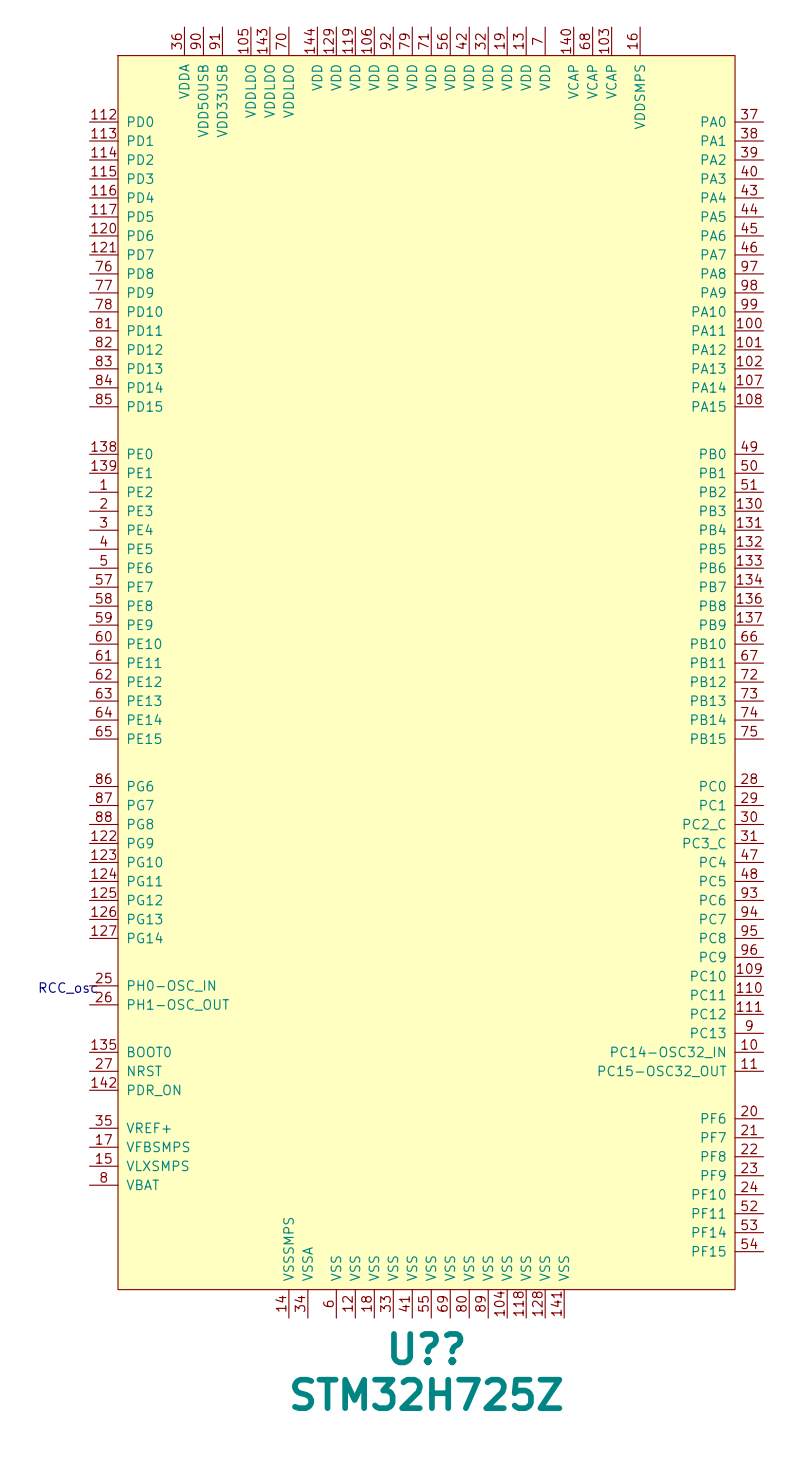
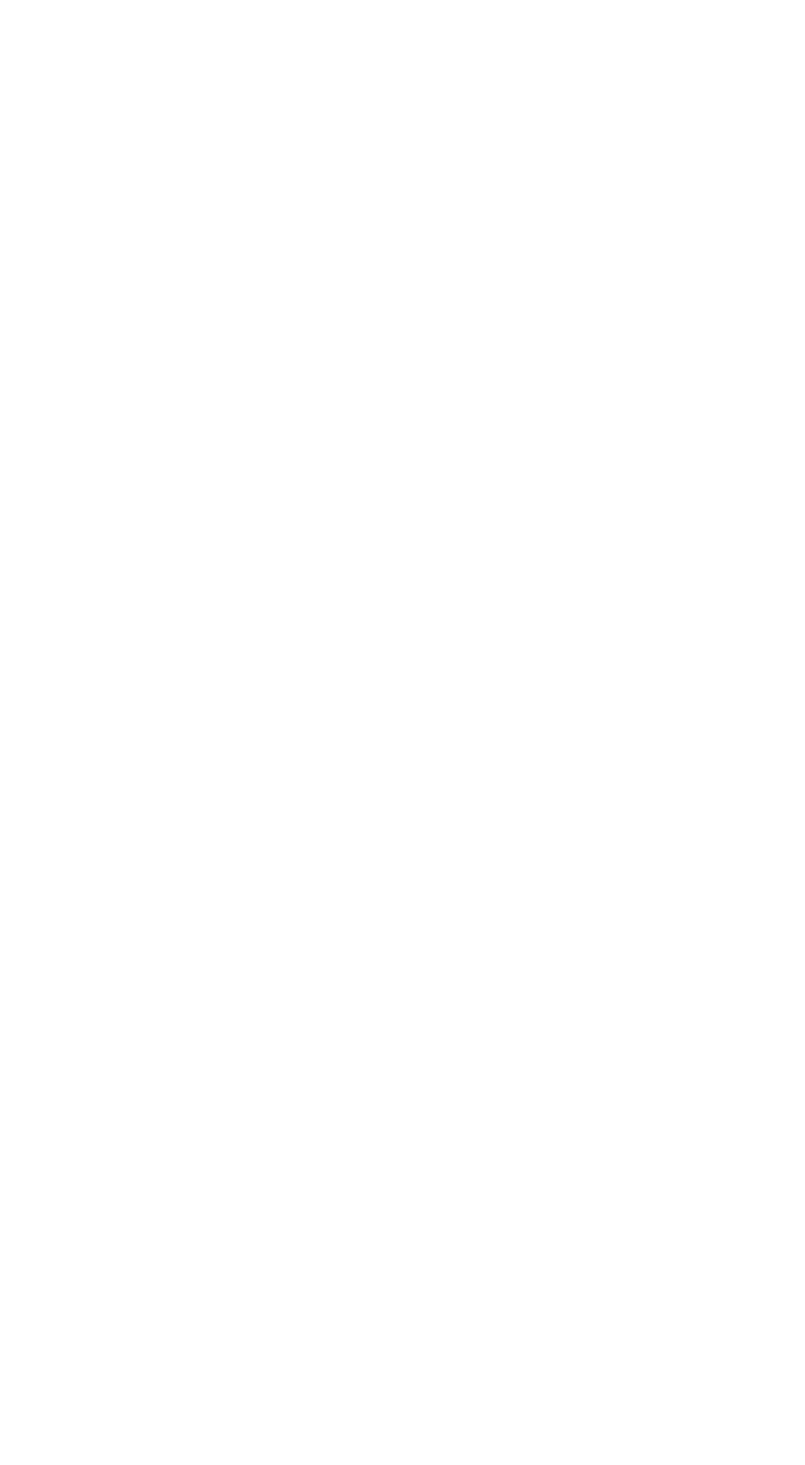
U??: STM32H725Z (426, 672) -> none
text: RCC_osc (68, 988) -> none

